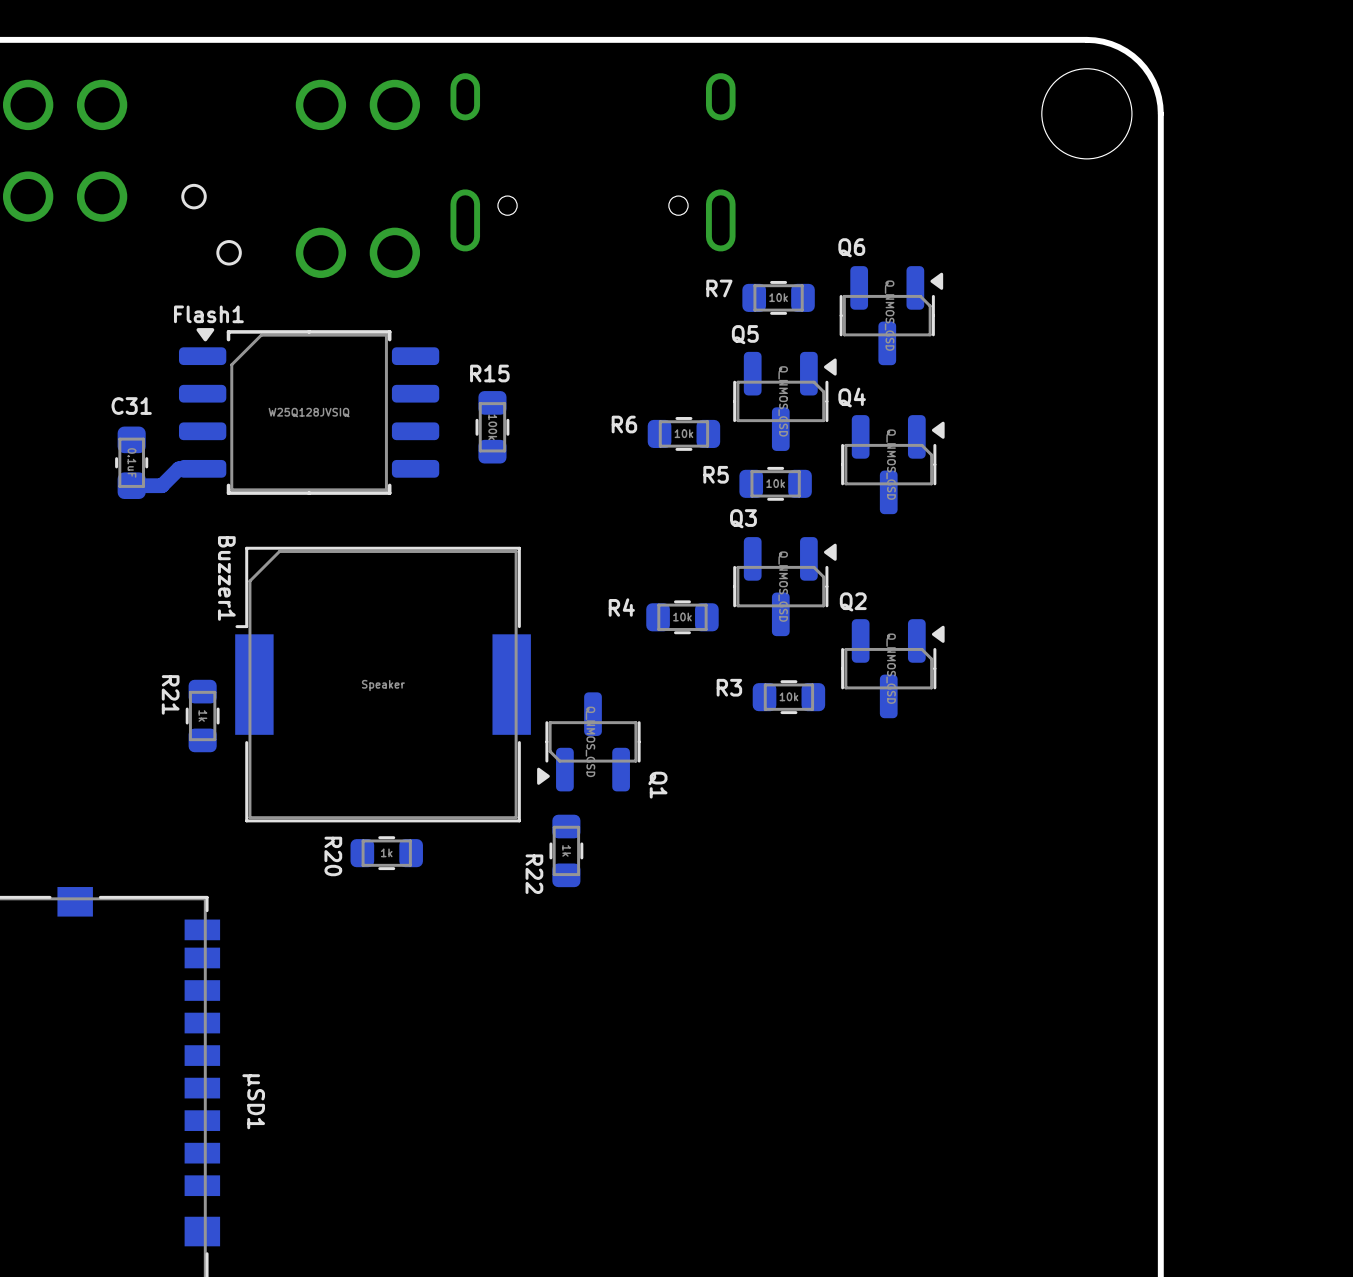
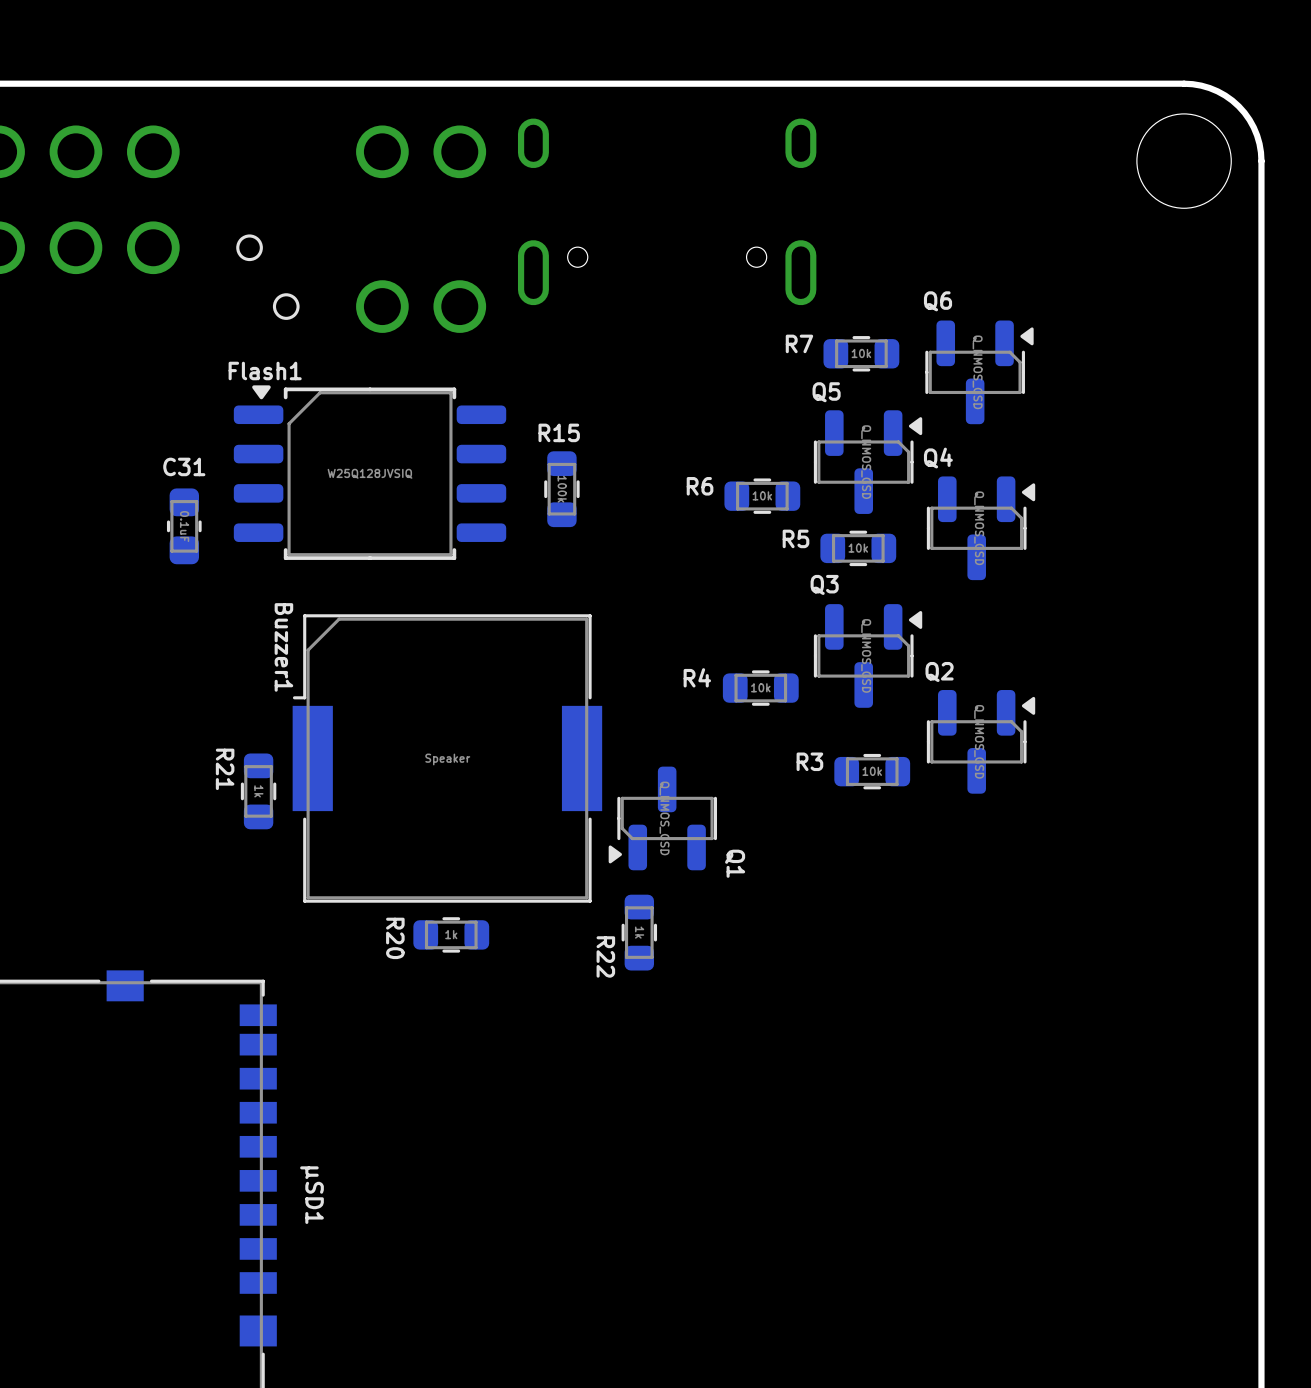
track: (202, 468) (178, 468) (161, 485) (131, 485) -> none

